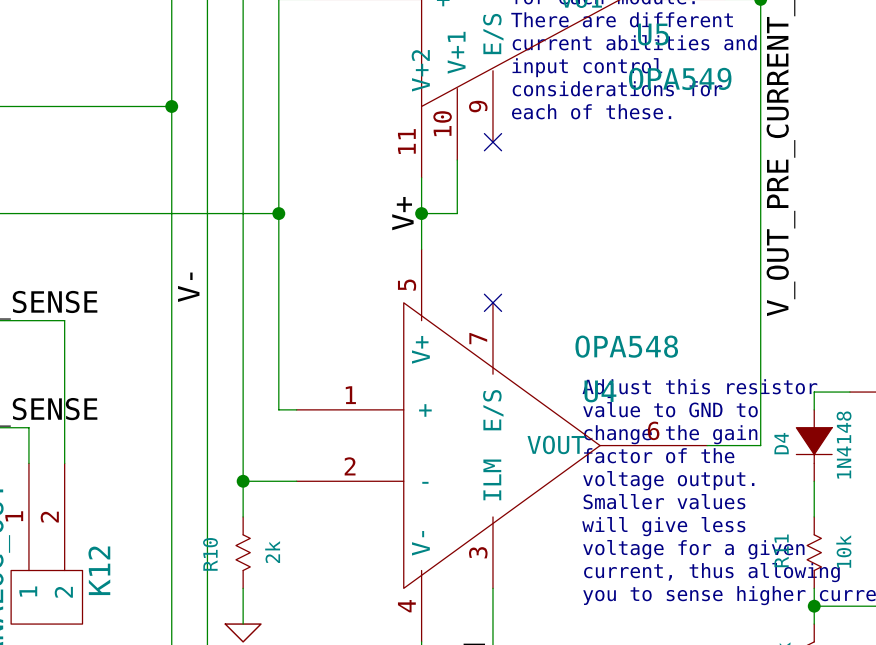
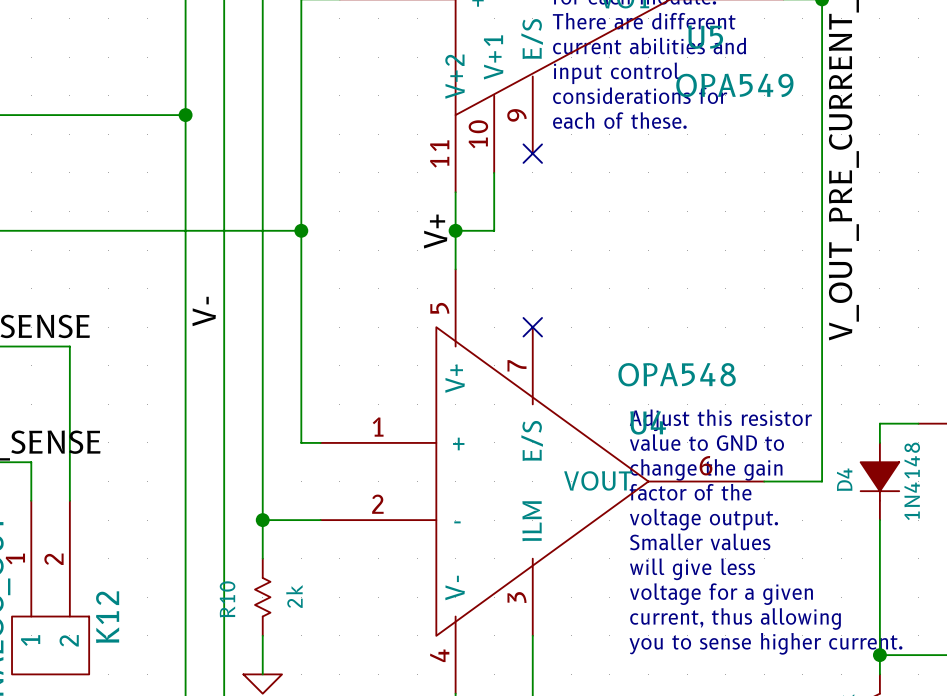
R11: 10k (814, 552) -> none

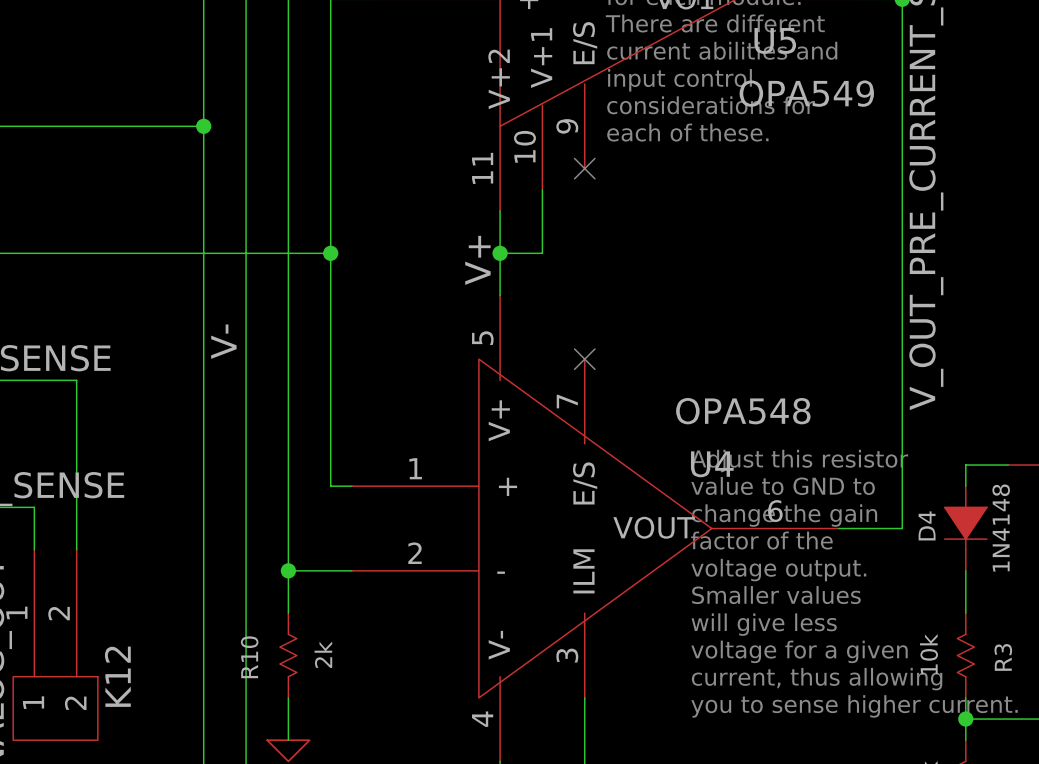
R3: none -> 10k (965, 655)

